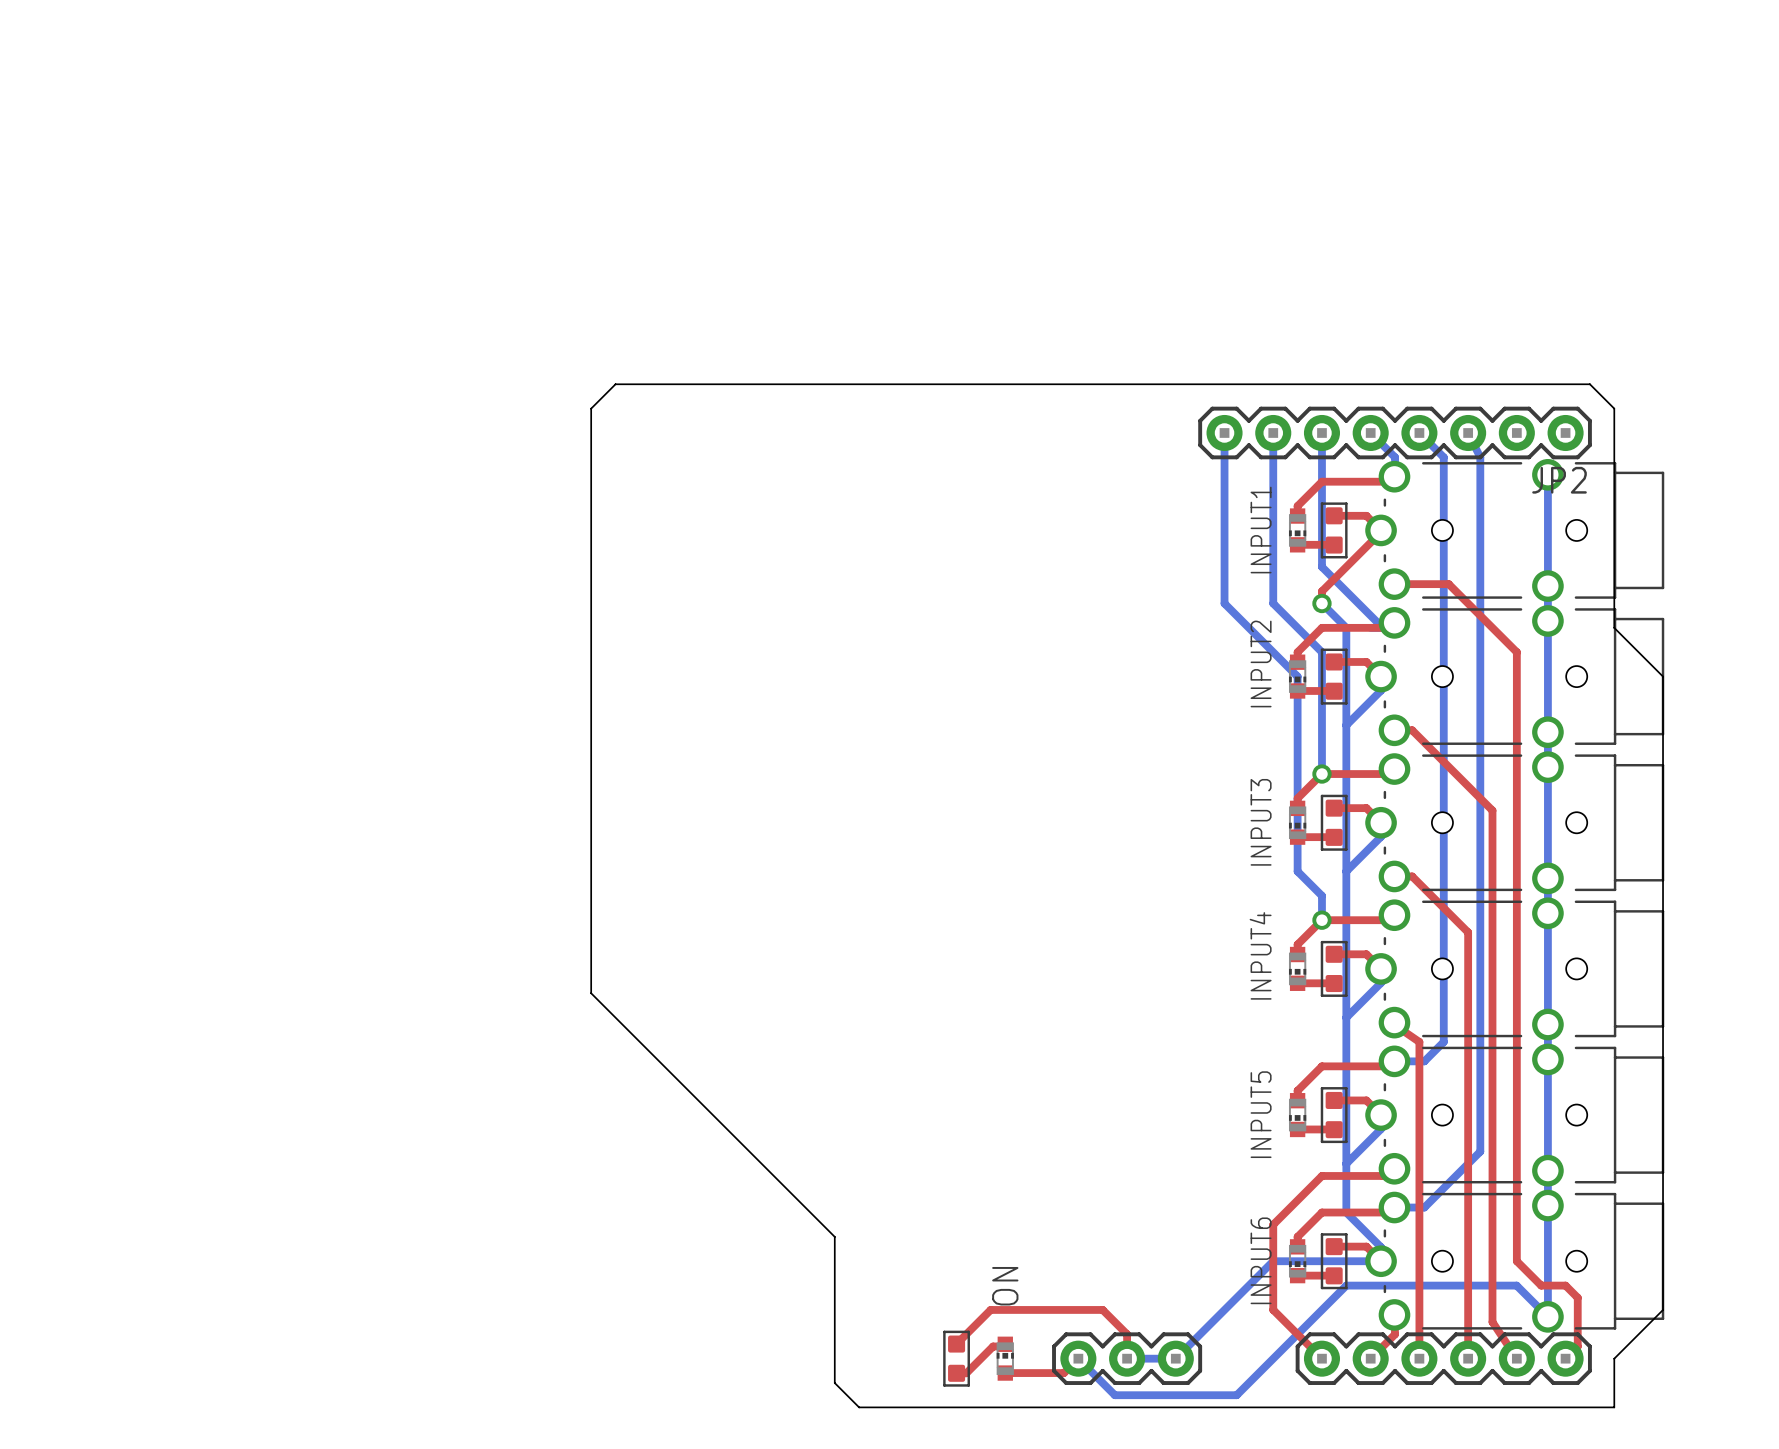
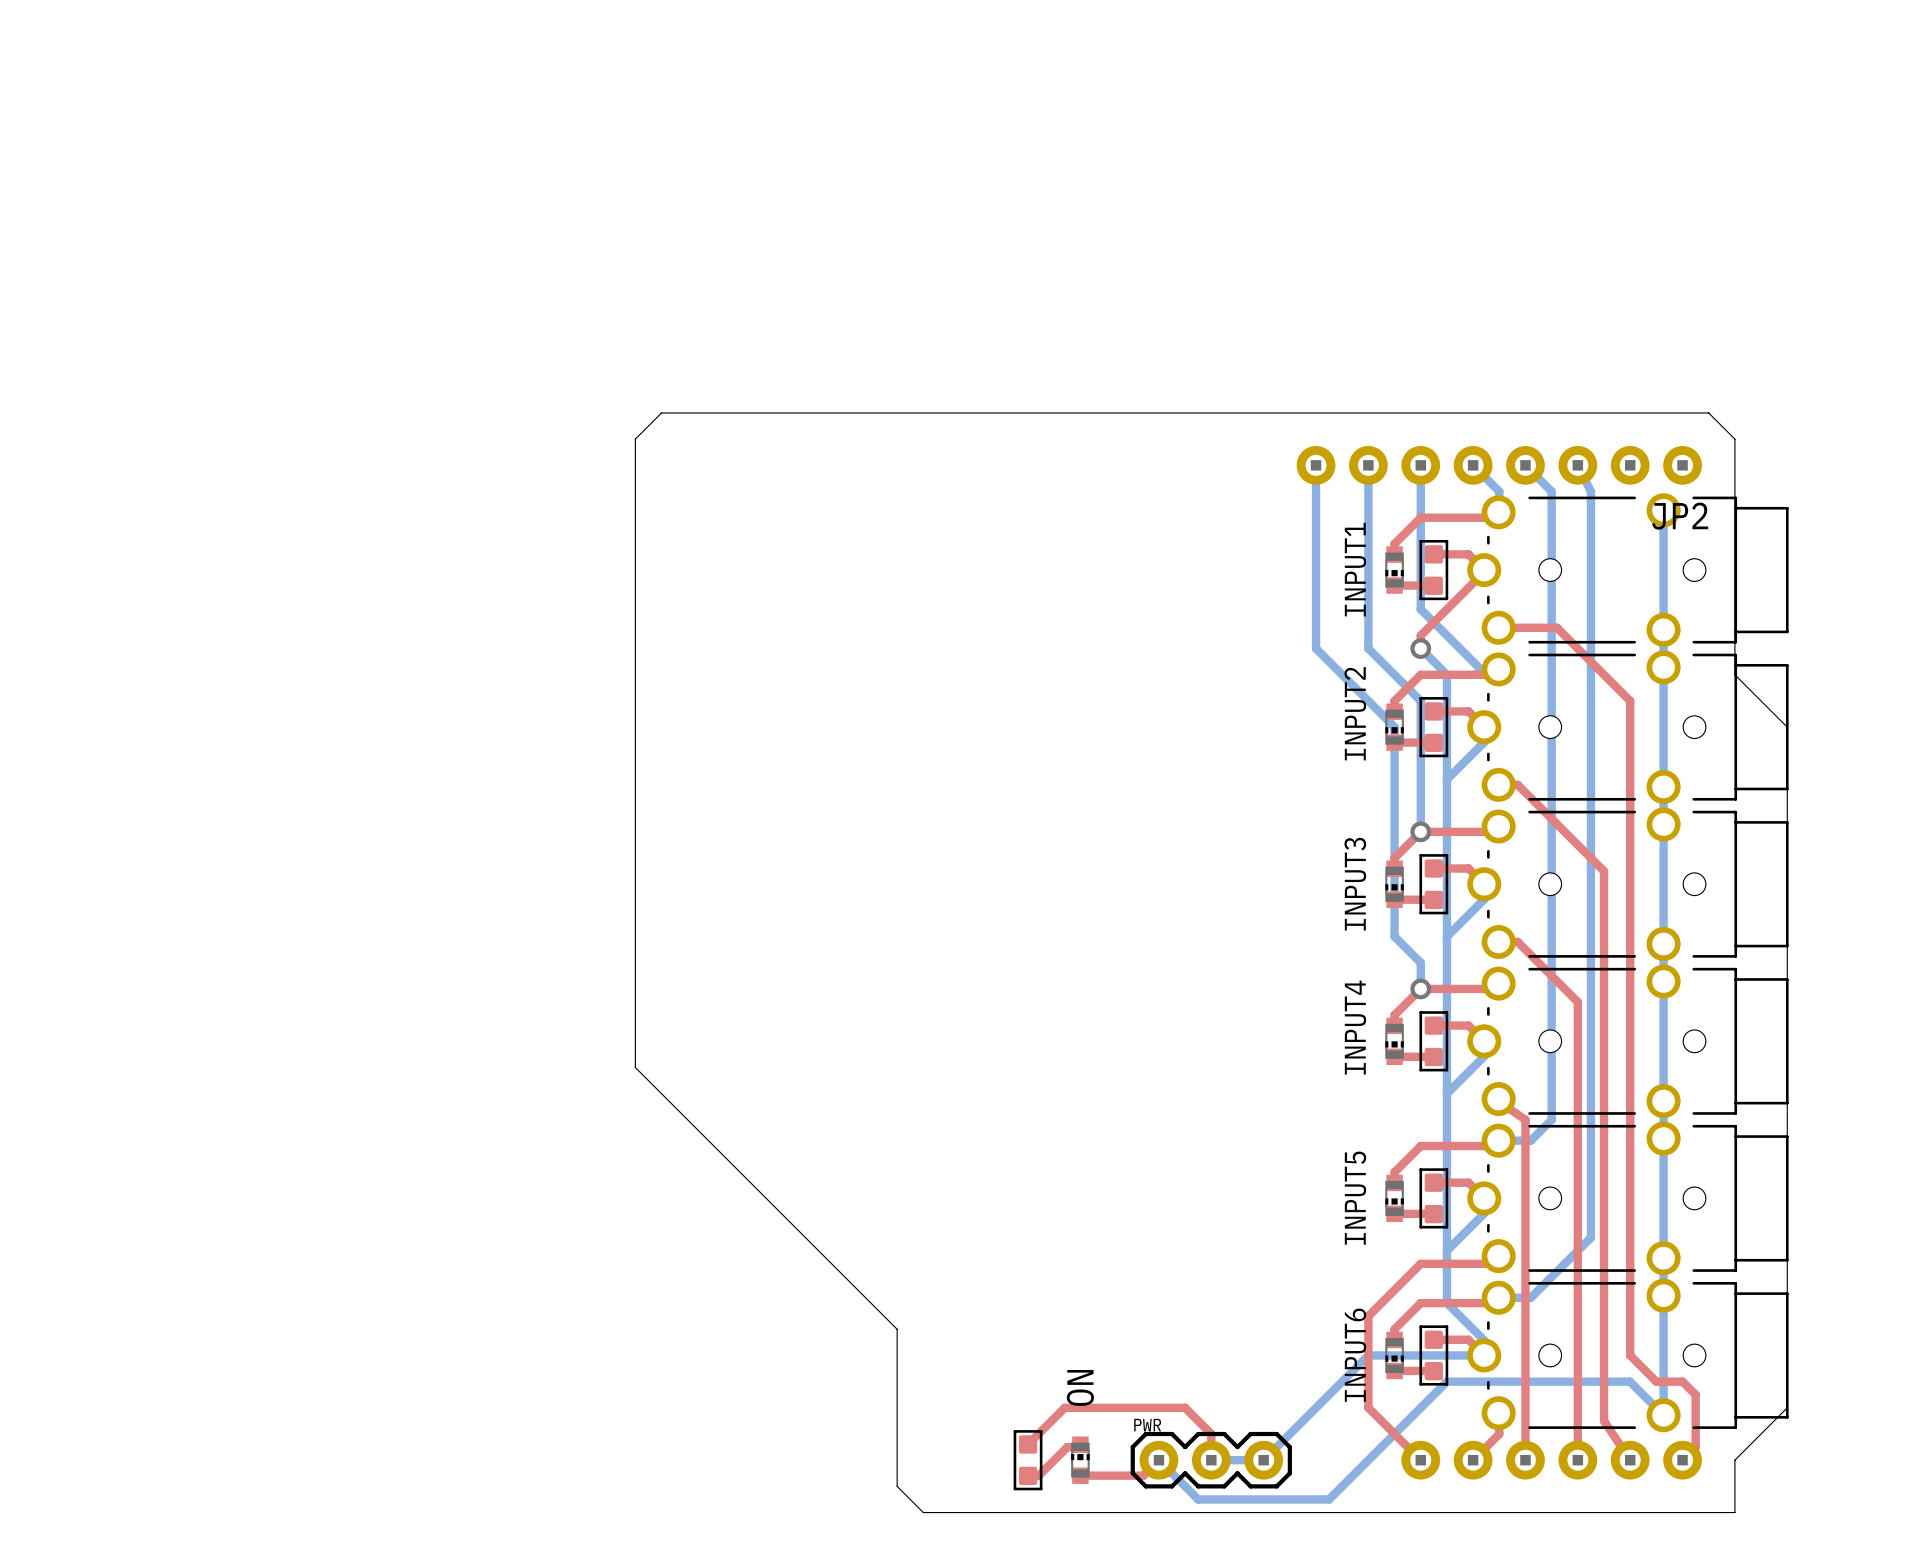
JP2 footprint: [1198, 406, 1592, 460] -> [1296, 445, 1702, 485]
PWR name: none -> PWR (1147, 1425)
part footprint: [1295, 1332, 1592, 1385] -> [1401, 1440, 1702, 1480]

